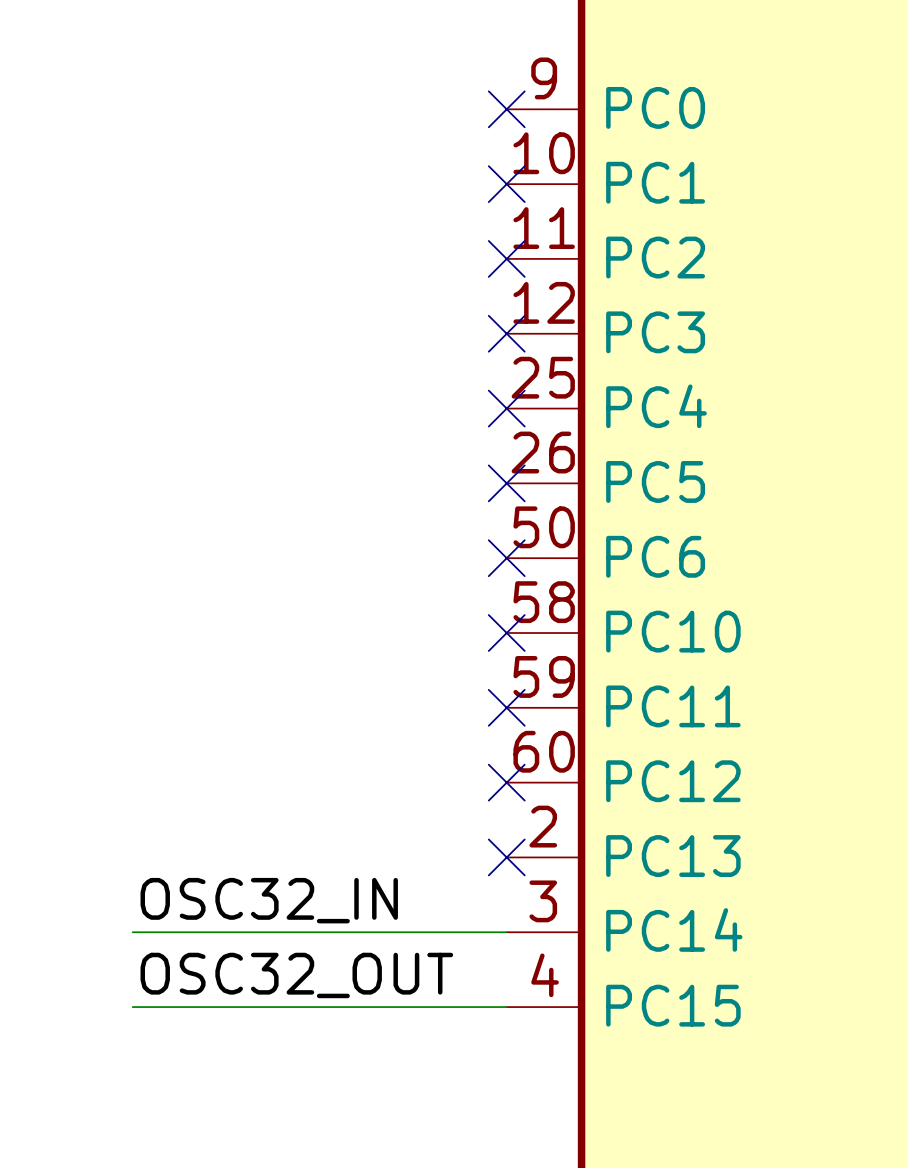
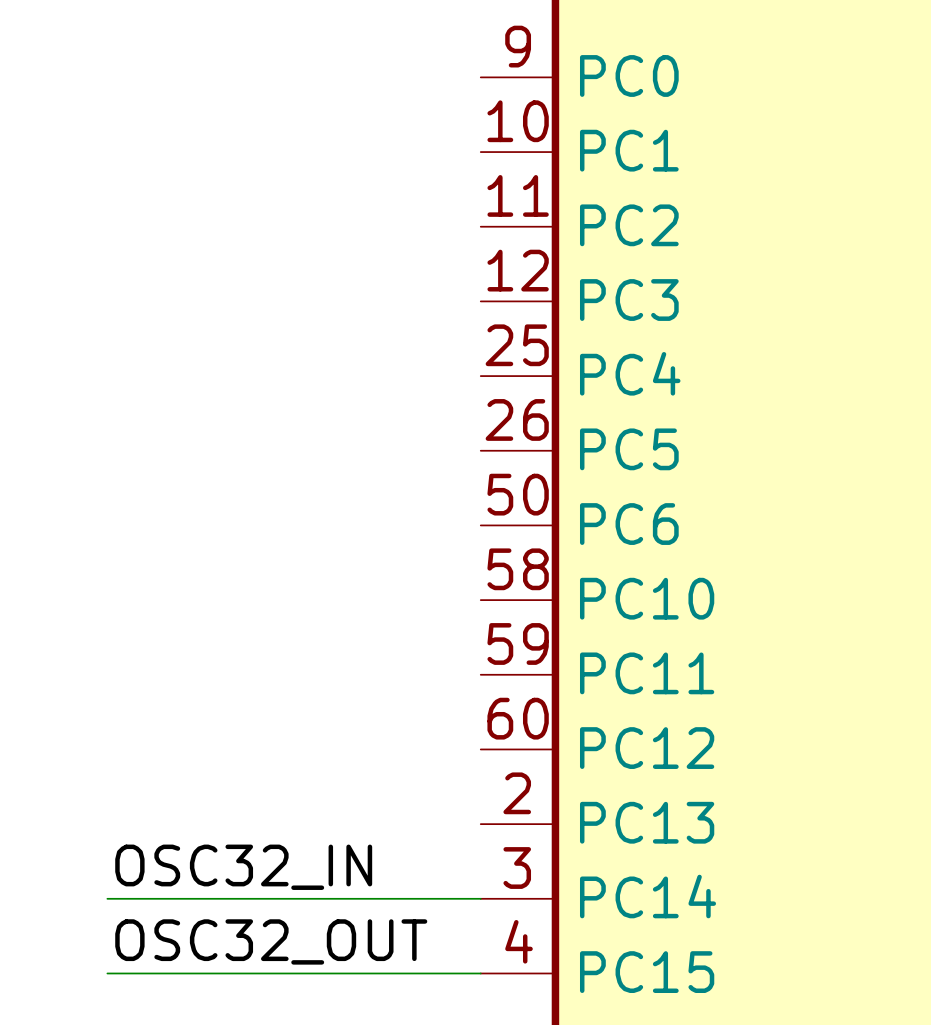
no-connect mark: (506, 109) -> none
no-connect mark: (506, 184) -> none
no-connect mark: (506, 258) -> none
no-connect mark: (506, 333) -> none
no-connect mark: (506, 408) -> none
no-connect mark: (506, 483) -> none
no-connect mark: (506, 558) -> none
no-connect mark: (506, 633) -> none
no-connect mark: (506, 707) -> none
no-connect mark: (506, 782) -> none
no-connect mark: (506, 857) -> none

